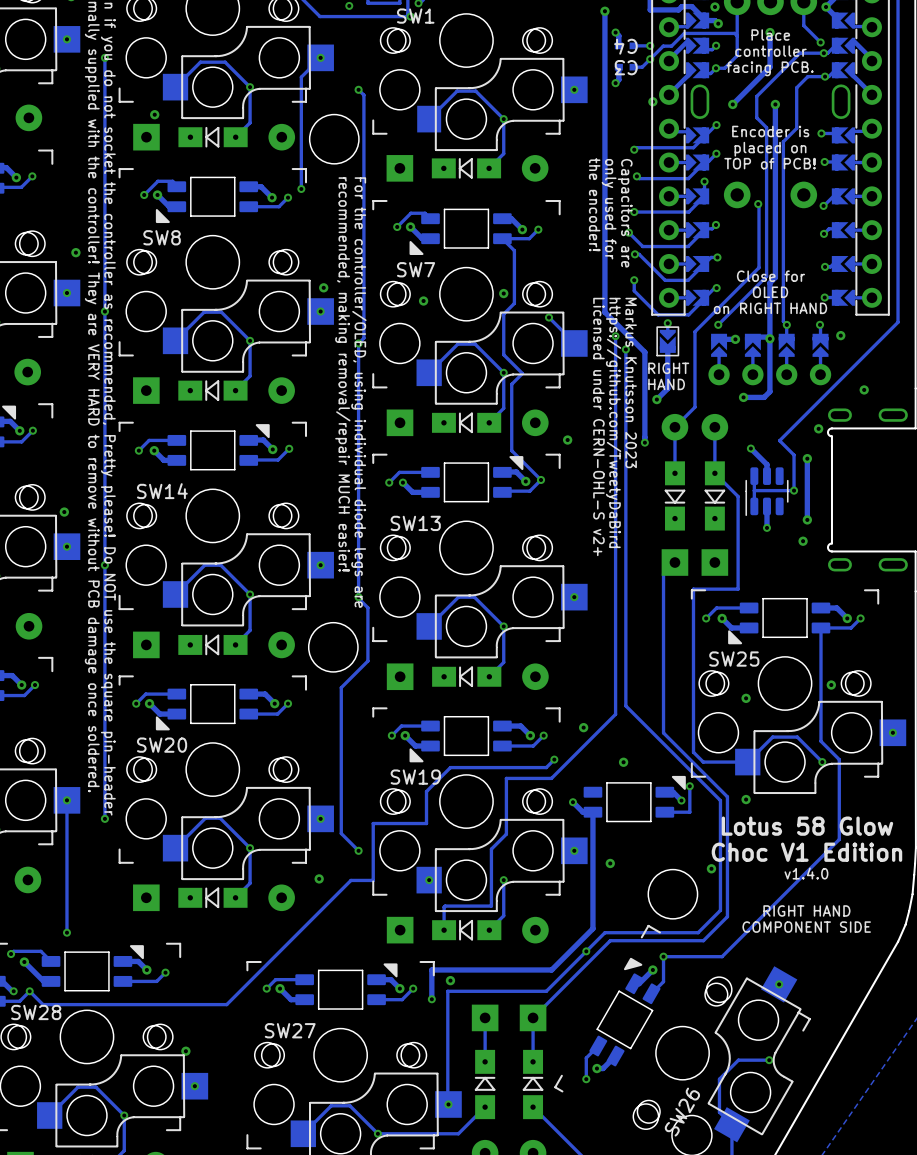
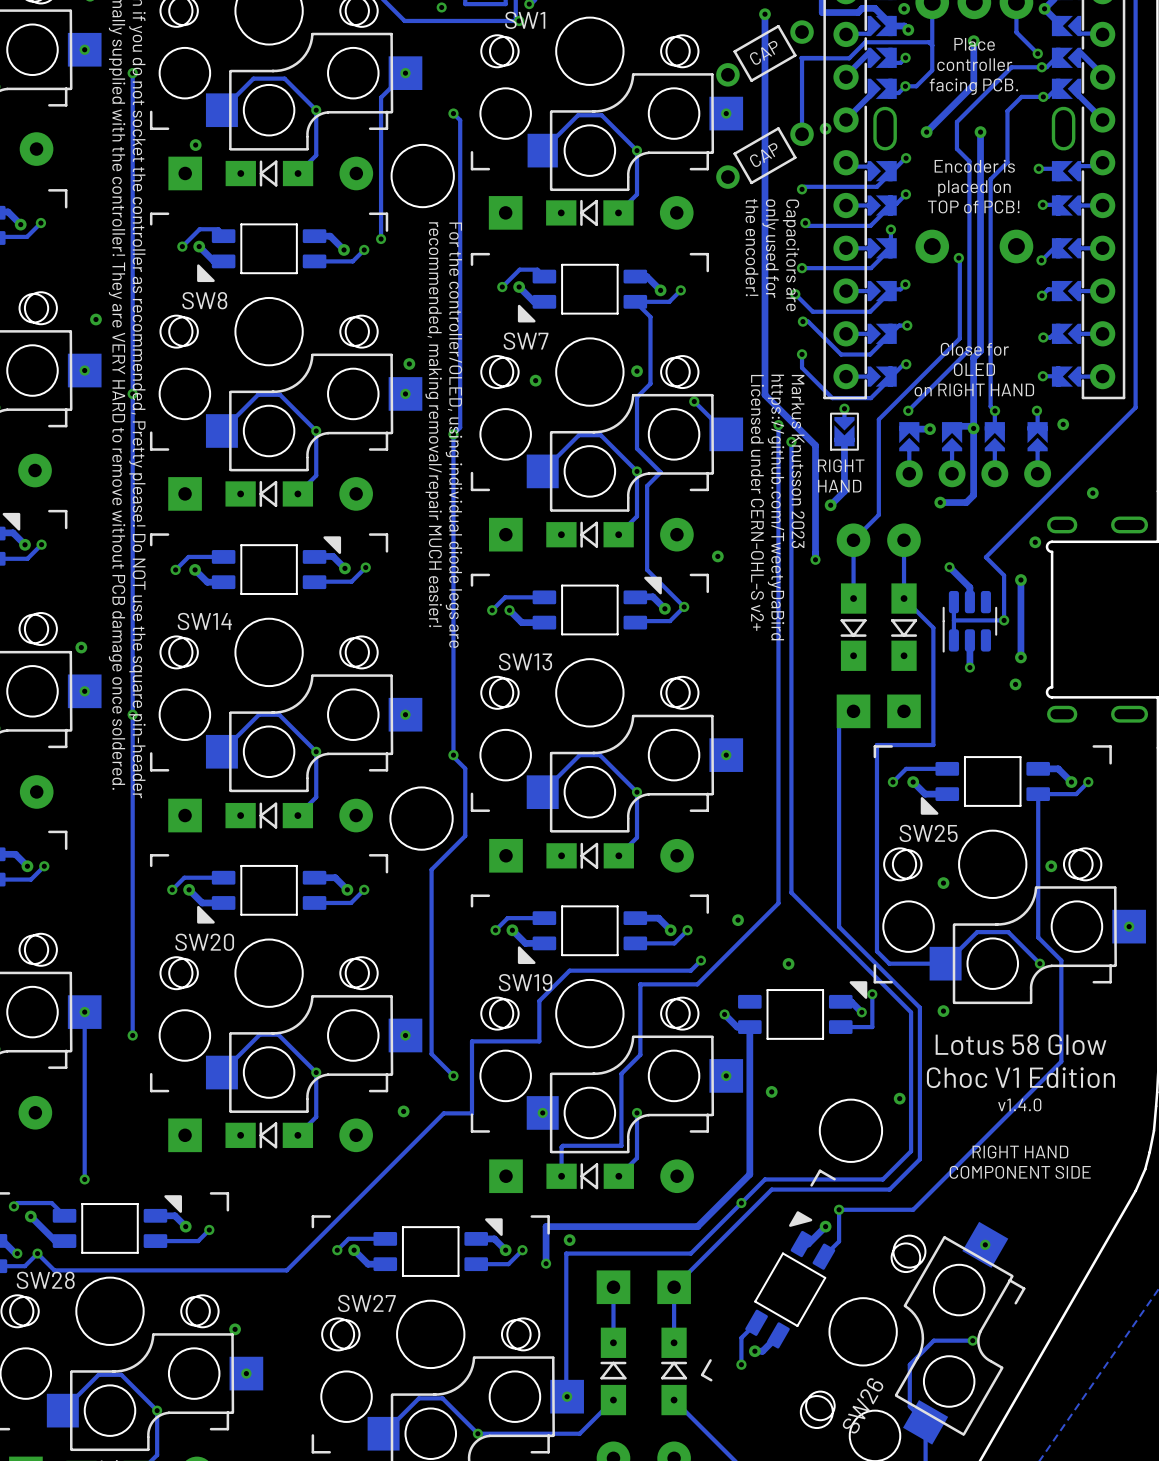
track: (615, 32) (618, 35) (618, 45) -> none
via: (615, 32) -> none
part: none -> (764, 53)
C4: (626, 45) -> none
via: (650, 45) -> none
track: (663, 46) (642, 67) (633, 67) -> (838, 58) (802, 58) (802, 134)
via: (650, 59) -> none
track: (618, 67) (618, 79) (615, 83) -> none
C3: (626, 67) -> none
via: (615, 83) -> none
part: none -> (764, 155)

